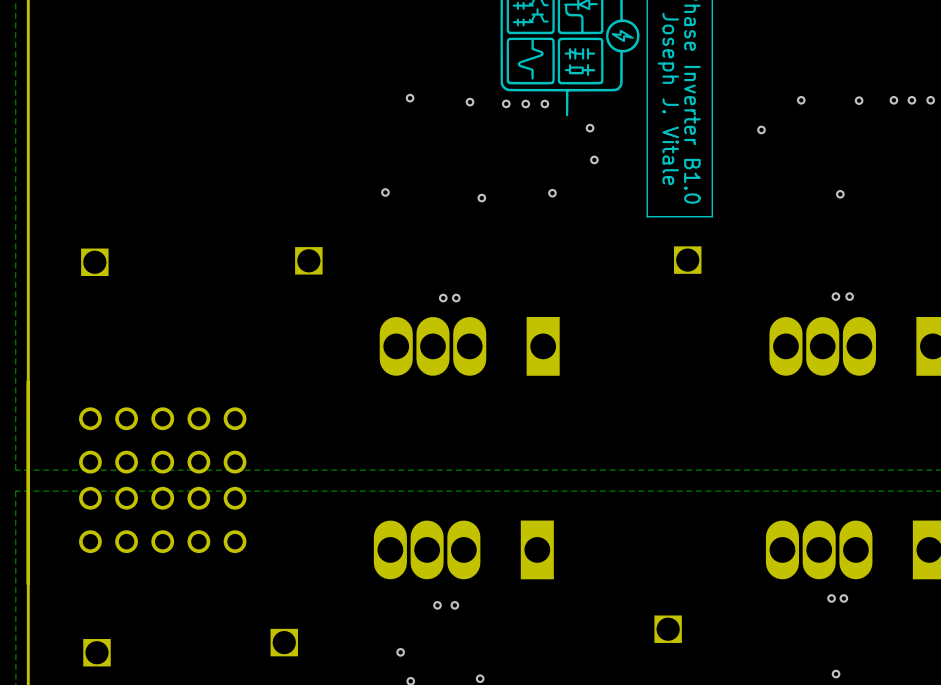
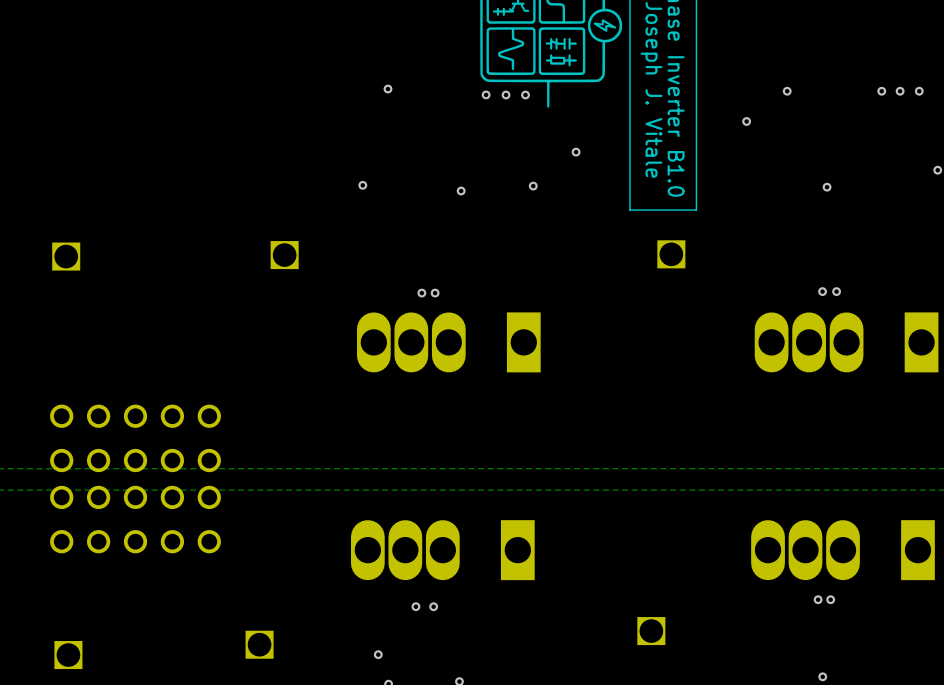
via: (859, 100) -> none
via: (470, 102) -> none
via: (590, 128) -> none

